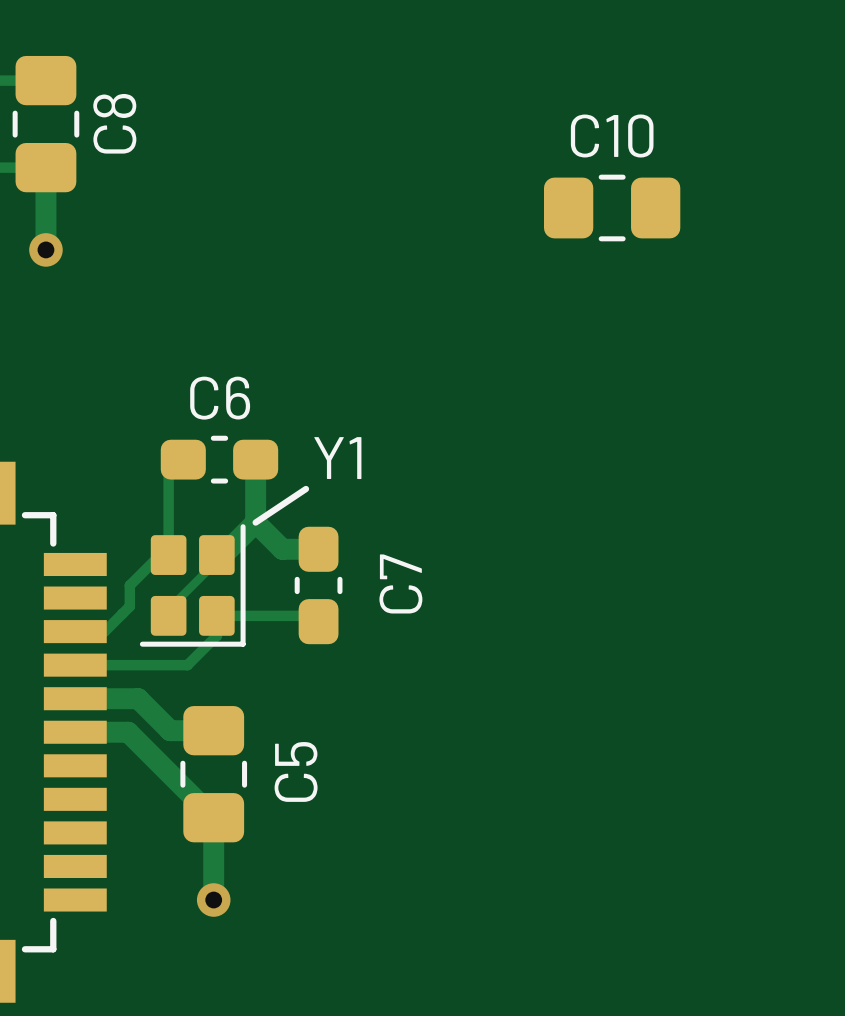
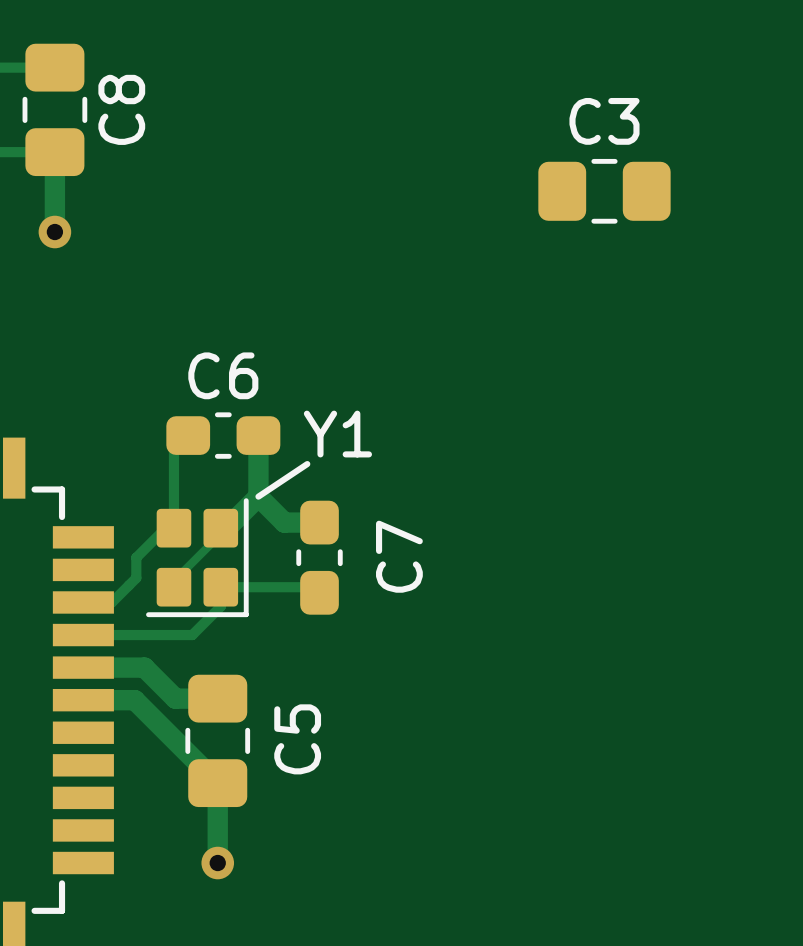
C10 name: C10 (612, 135) -> C3 (604, 121)

